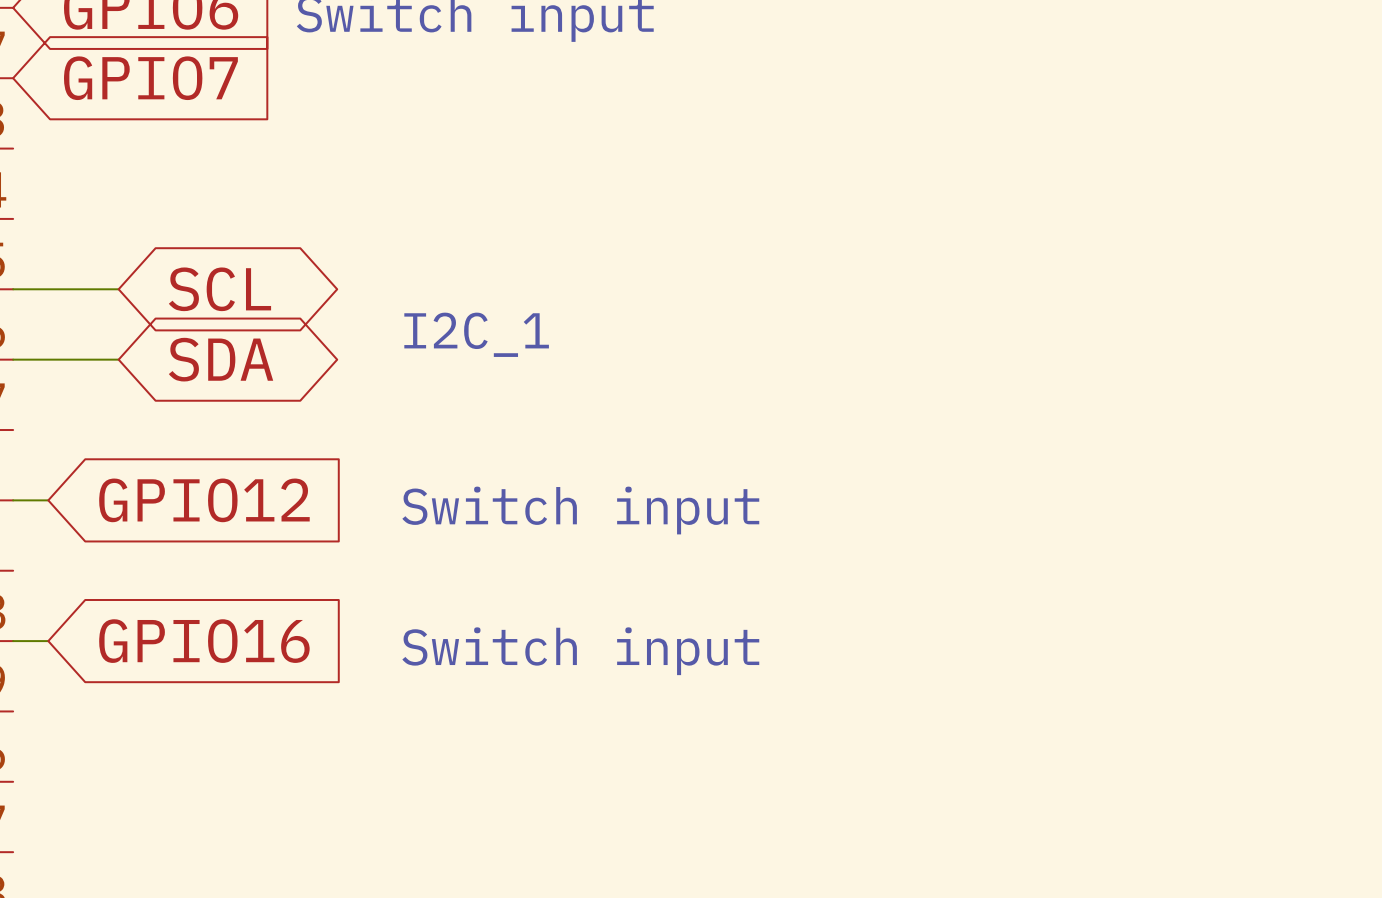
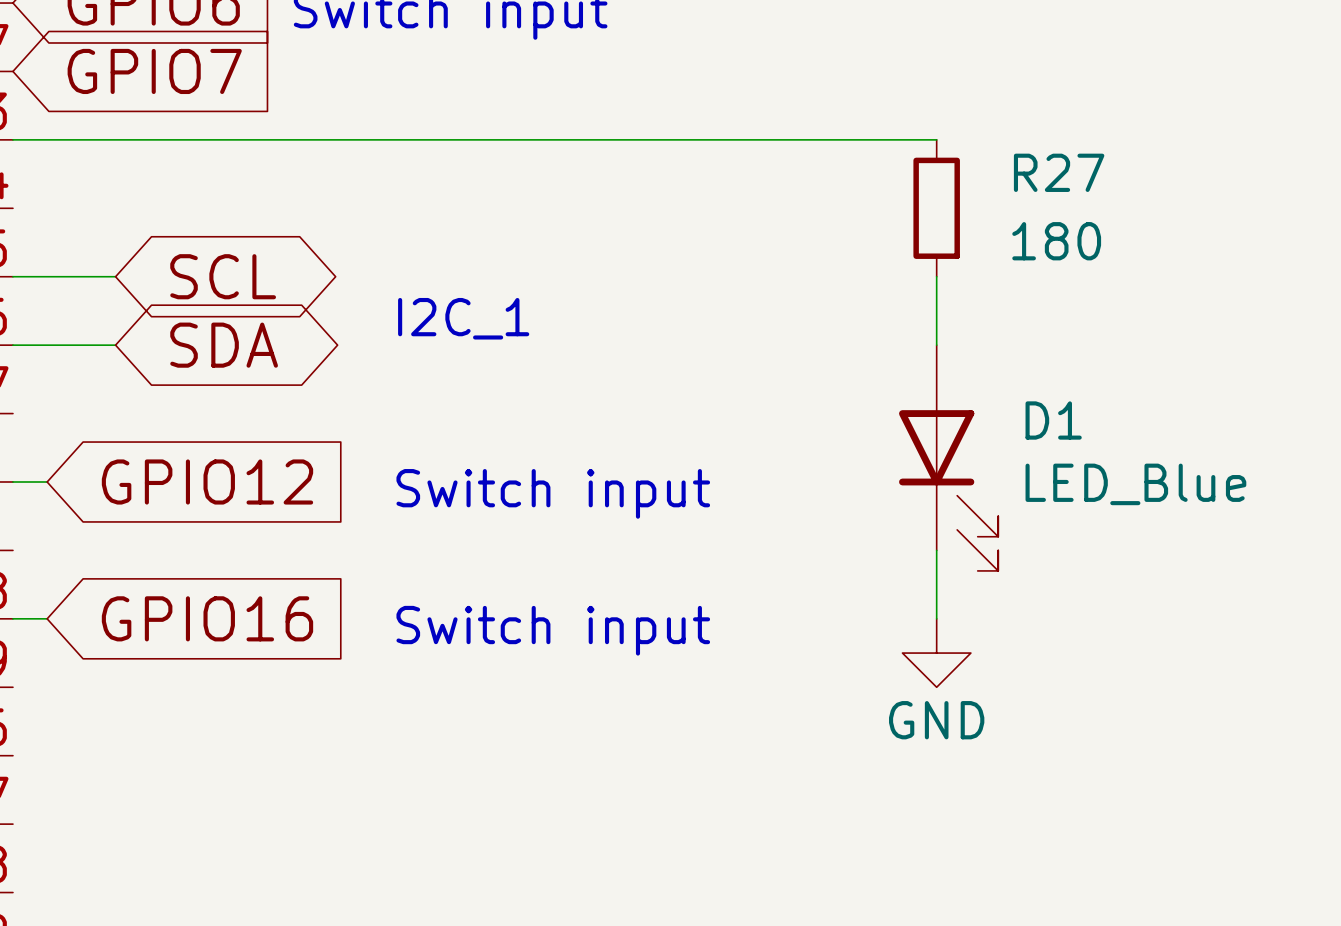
wire: none -> (12, 139) (936, 139)
R27: none -> 180 (936, 208)
wire: none -> (936, 276) (936, 345)
D1: none -> LED_Blue (948, 458)
wire: none -> (936, 550) (936, 618)
power symbol: none -> GND (936, 653)

